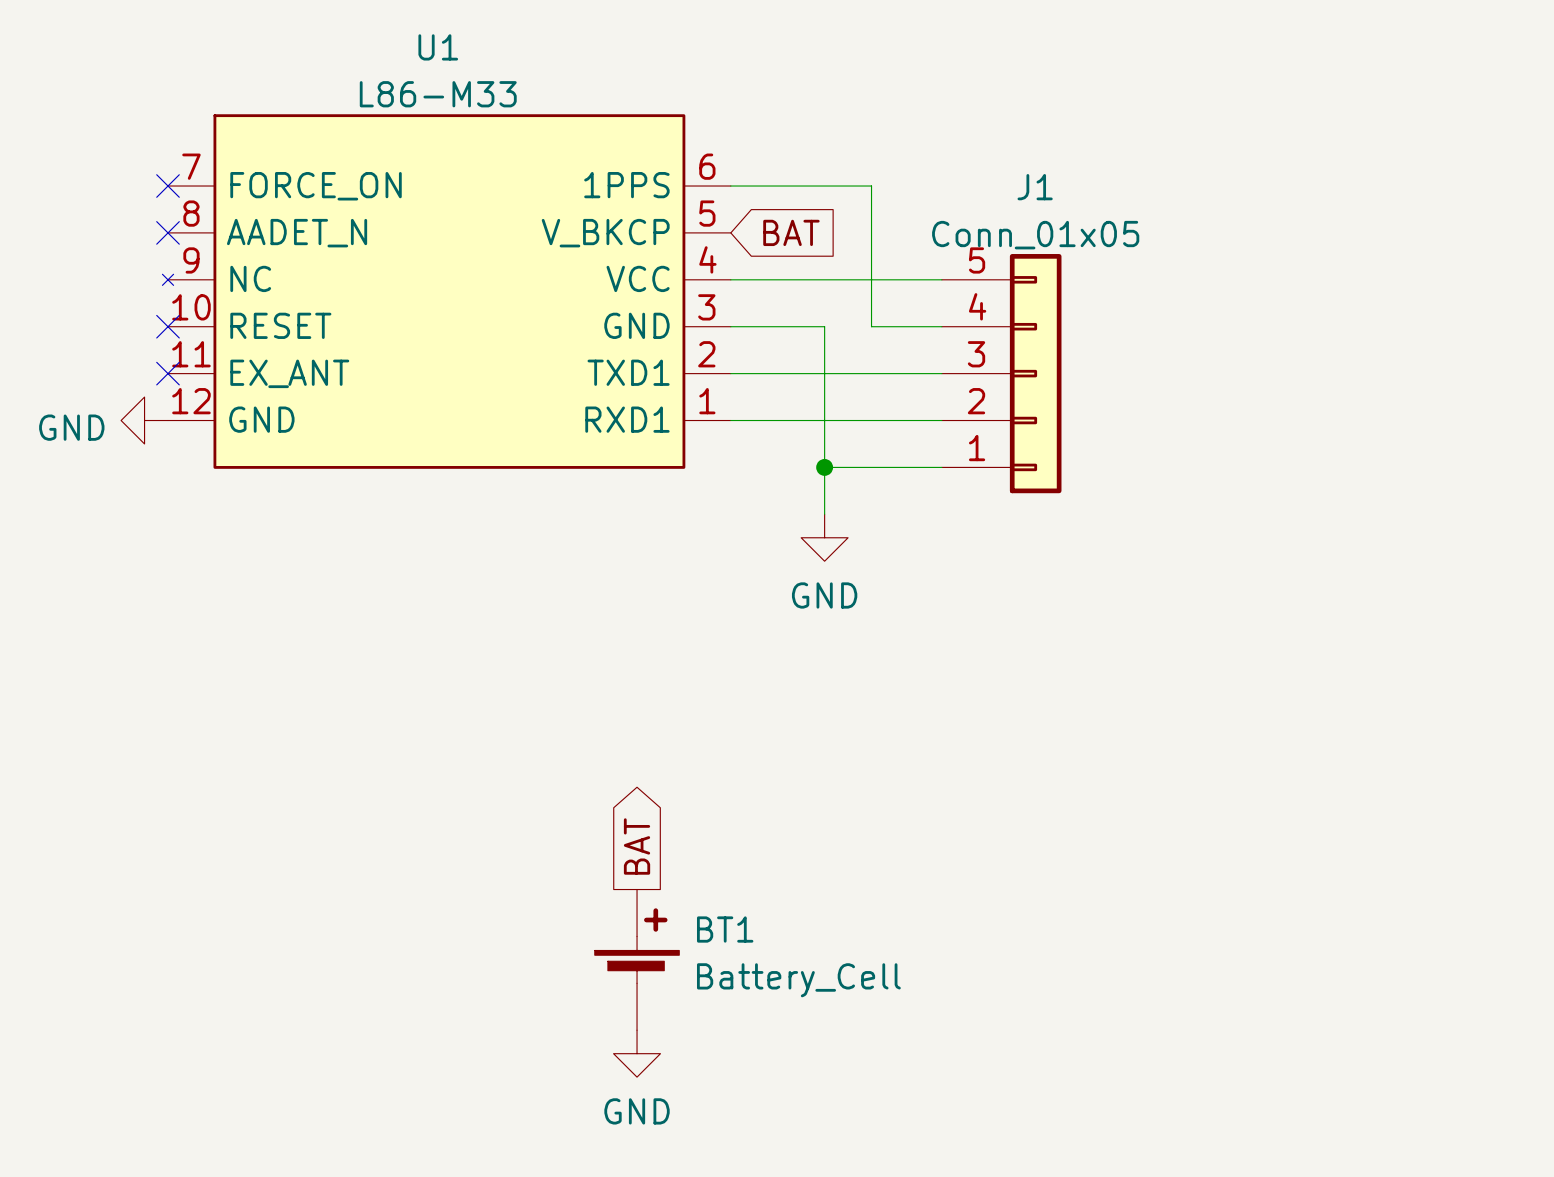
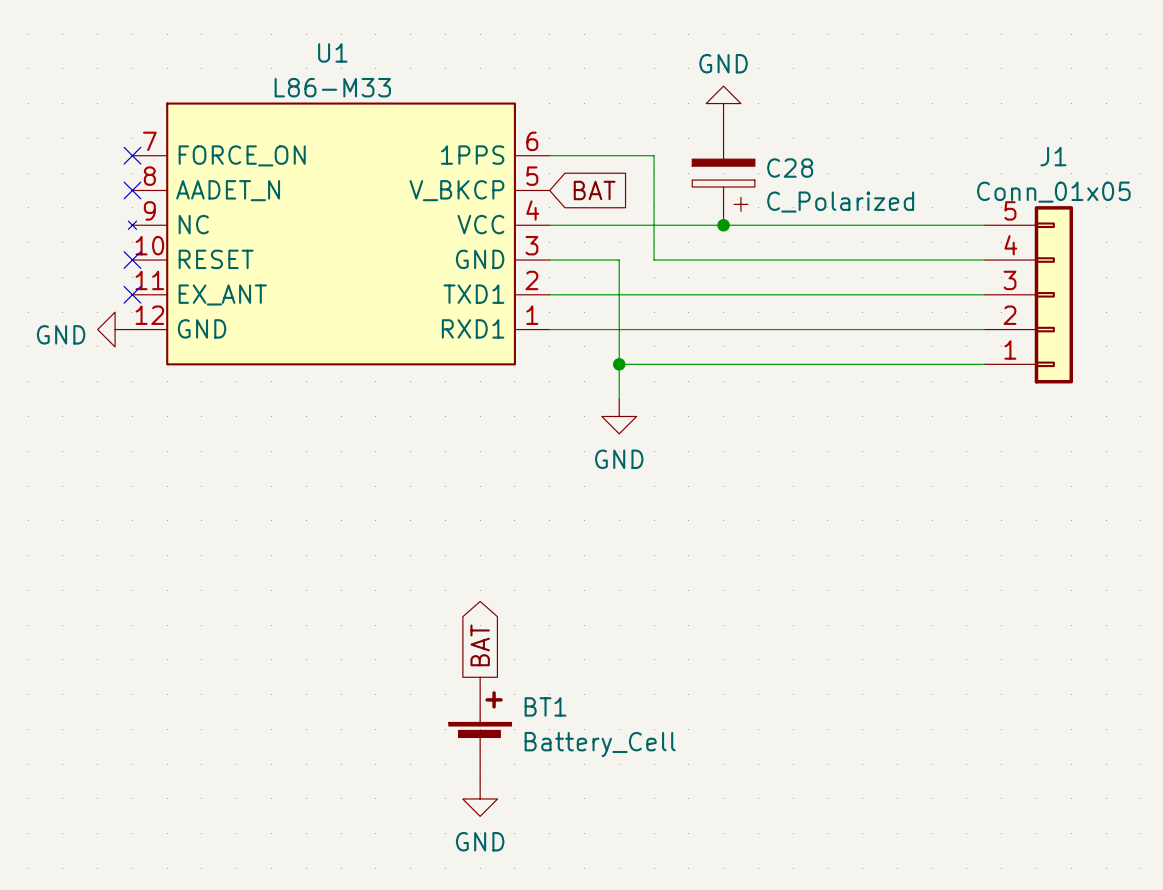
power symbol: none -> GND (723, 103)
C28: none -> C_Polarized (723, 173)
wire: none -> (706, 225) (984, 225)
junction: none -> (723, 225)
wire: none -> (706, 260) (984, 260)
wire: none -> (706, 294) (984, 294)
J1 position: (1001, 373) -> (1028, 294)
wire: none -> (706, 329) (984, 329)
wire: none -> (706, 364) (984, 364)

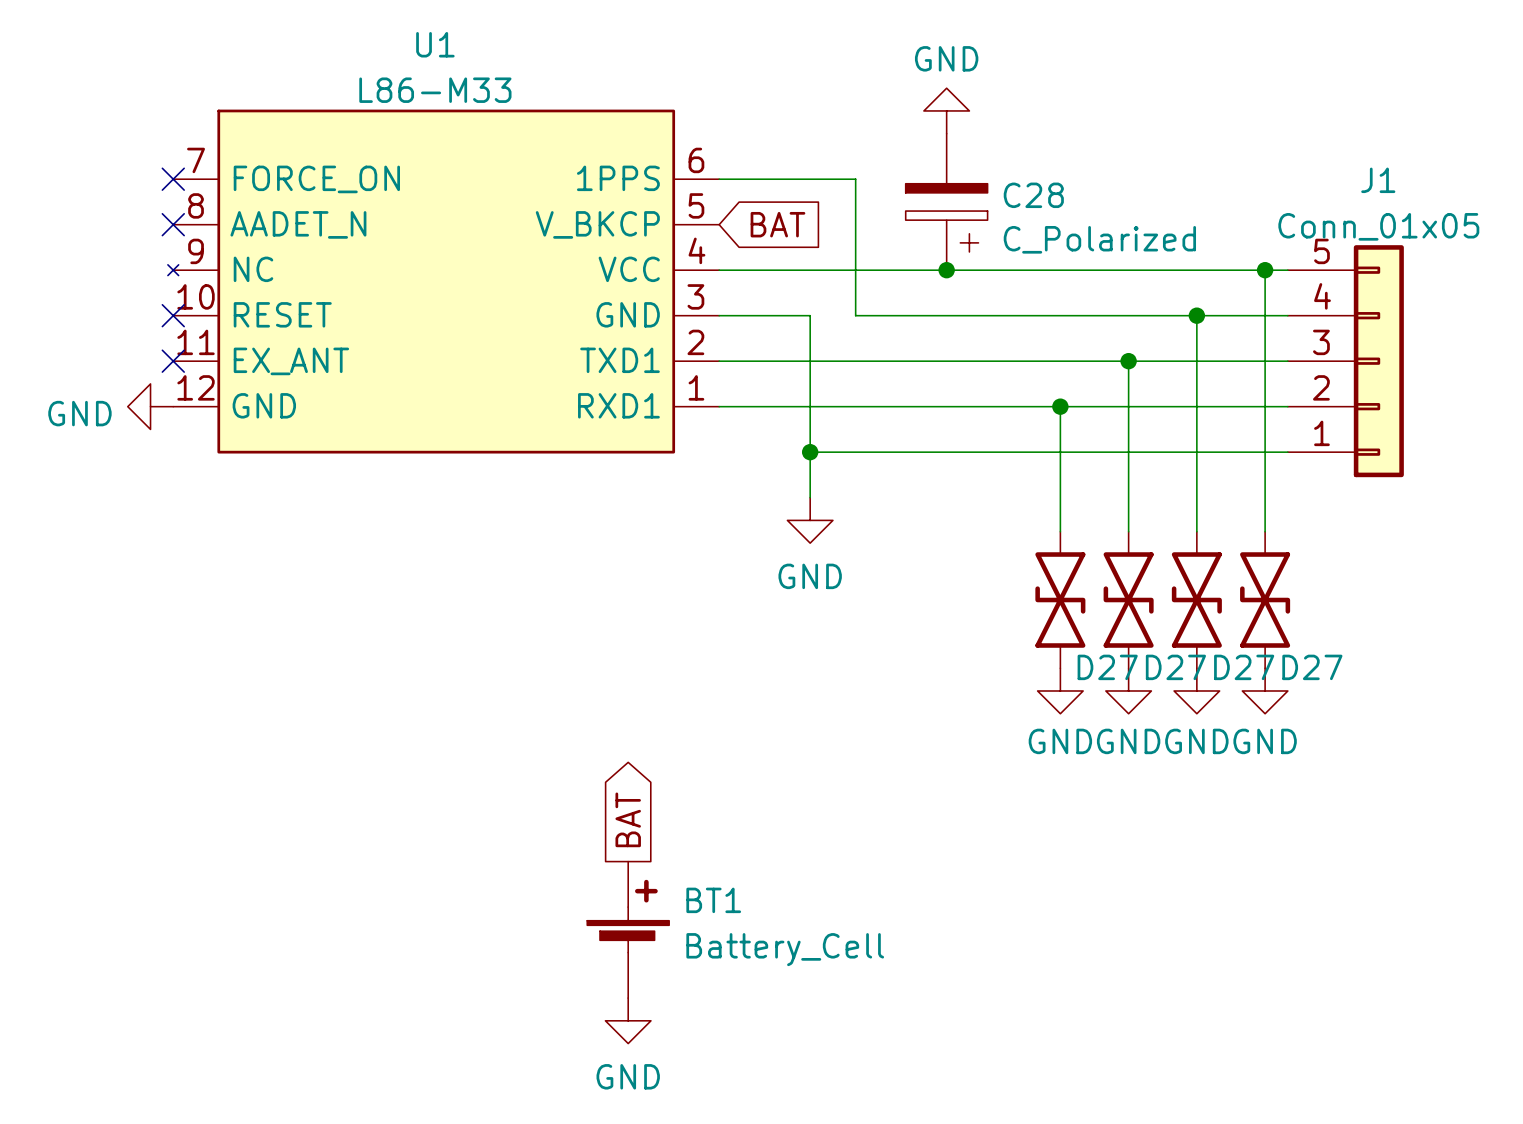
wire: none -> (1265, 270) (1265, 531)
junction: none -> (1265, 270)
wire: none -> (1196, 315) (1196, 531)
junction: none -> (1196, 315)
wire: none -> (1128, 361) (1128, 531)
junction: none -> (1128, 361)
wire: none -> (1060, 406) (1060, 531)
junction: none -> (1060, 406)
D27: none -> (1060, 600)
D27: none -> (1128, 600)
D27: none -> (1196, 600)
D27: none -> (1265, 600)
power symbol: none -> GND (1060, 690)
power symbol: none -> GND (1128, 690)
power symbol: none -> GND (1196, 690)
power symbol: none -> GND (1265, 690)

